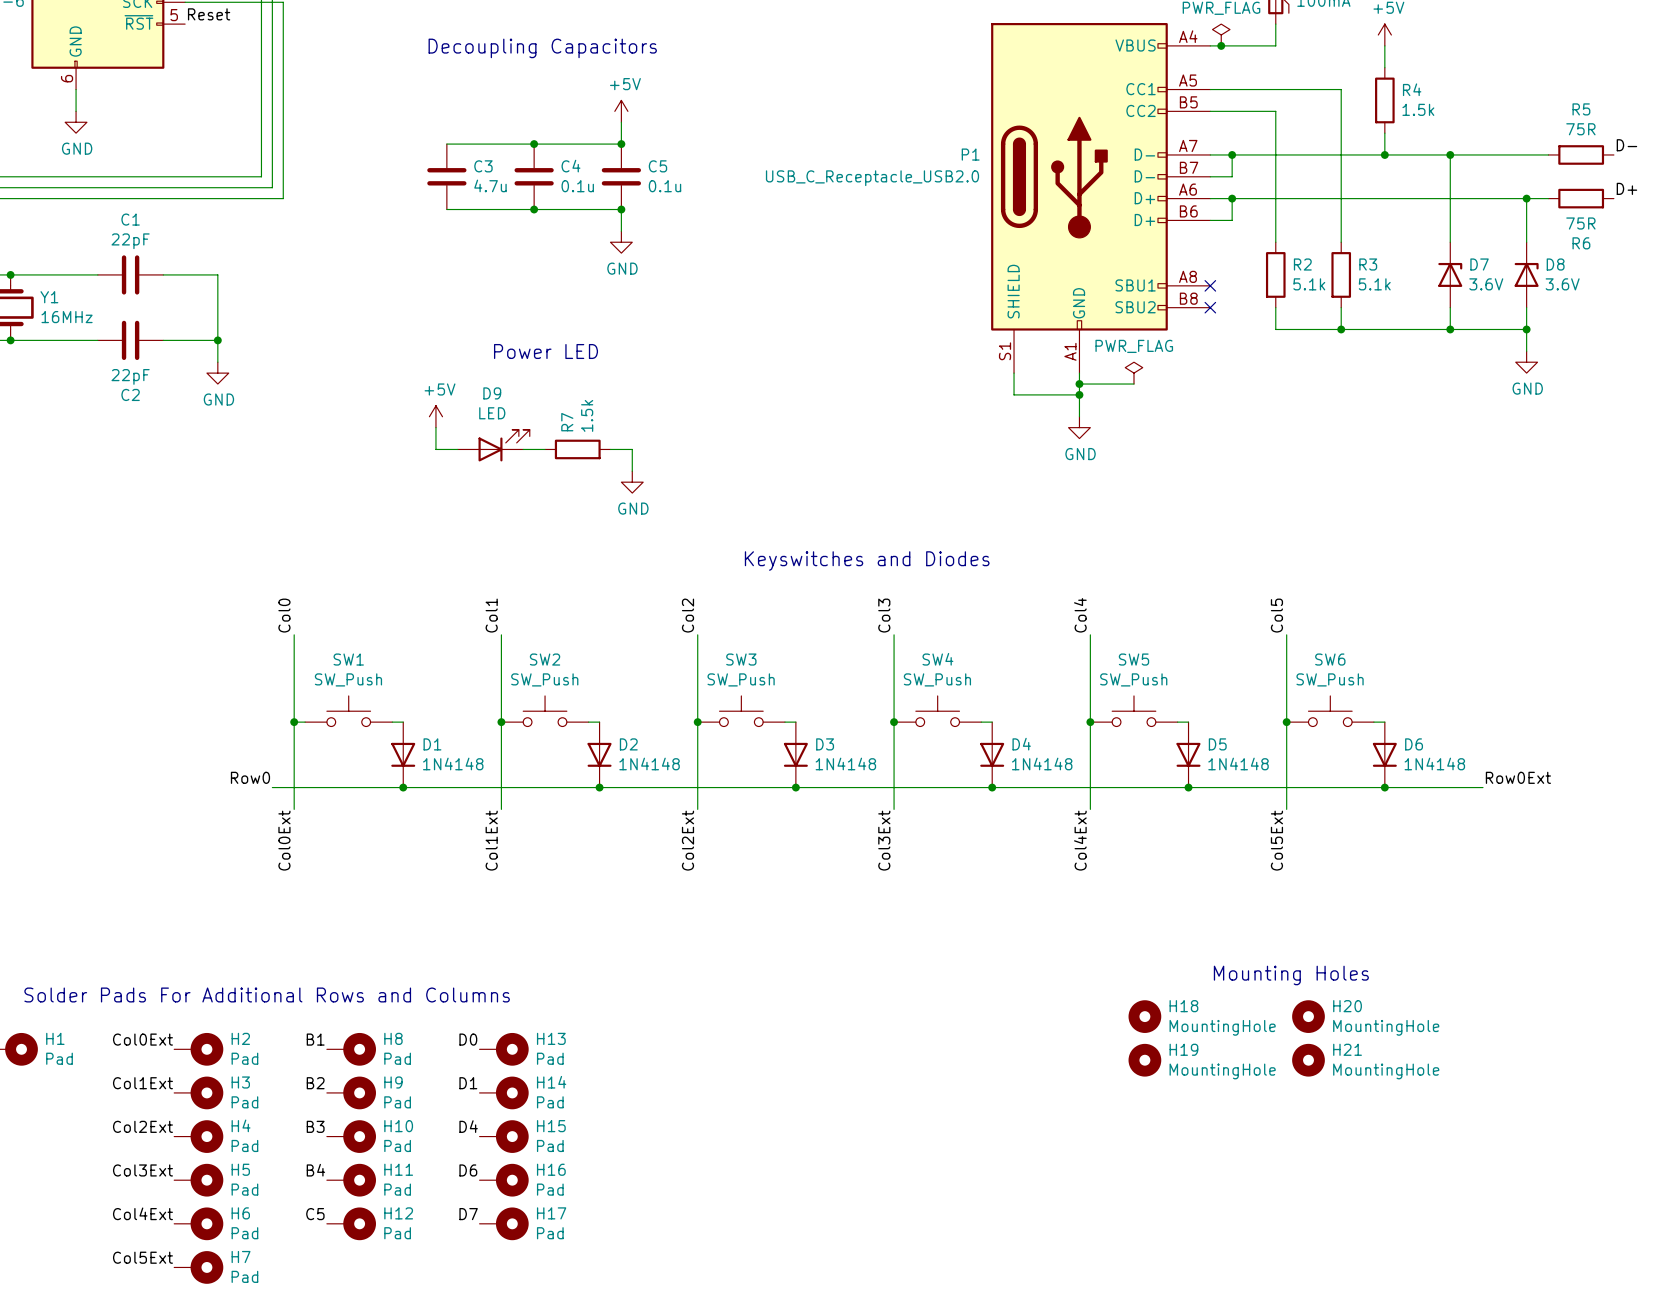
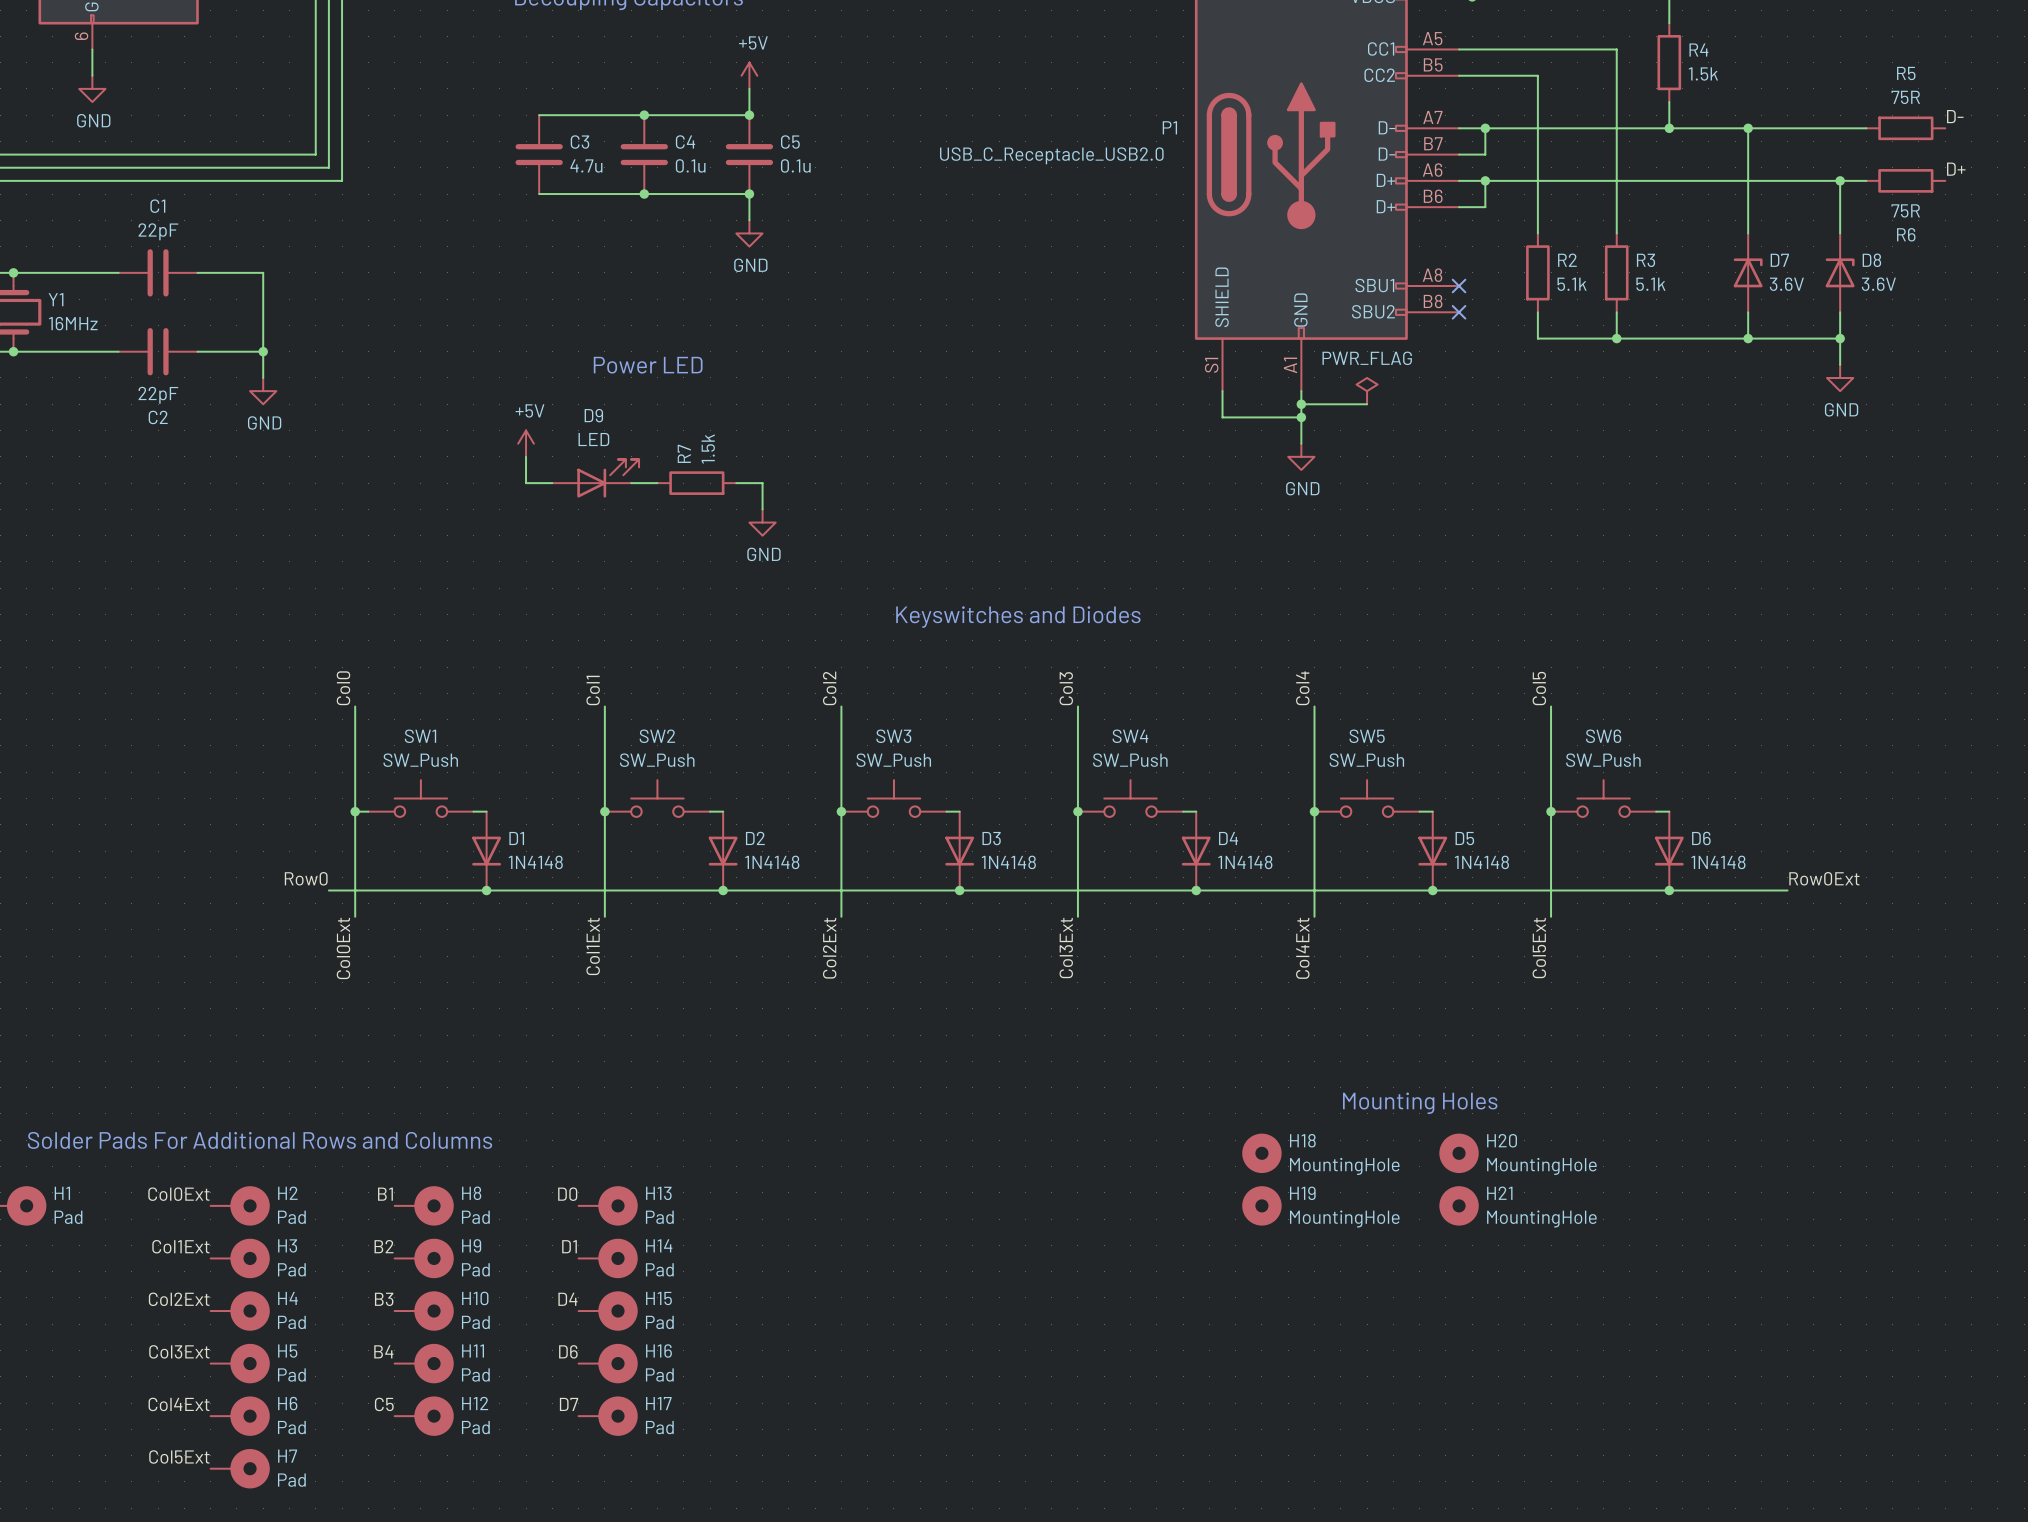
text position: Mounting Holes (1291, 975) -> Mounting Holes (1420, 1103)
H18 position: (1144, 1016) -> (1261, 1153)
H20 position: (1308, 1016) -> (1459, 1153)
H19 position: (1144, 1060) -> (1261, 1205)
H21 position: (1308, 1060) -> (1459, 1205)

